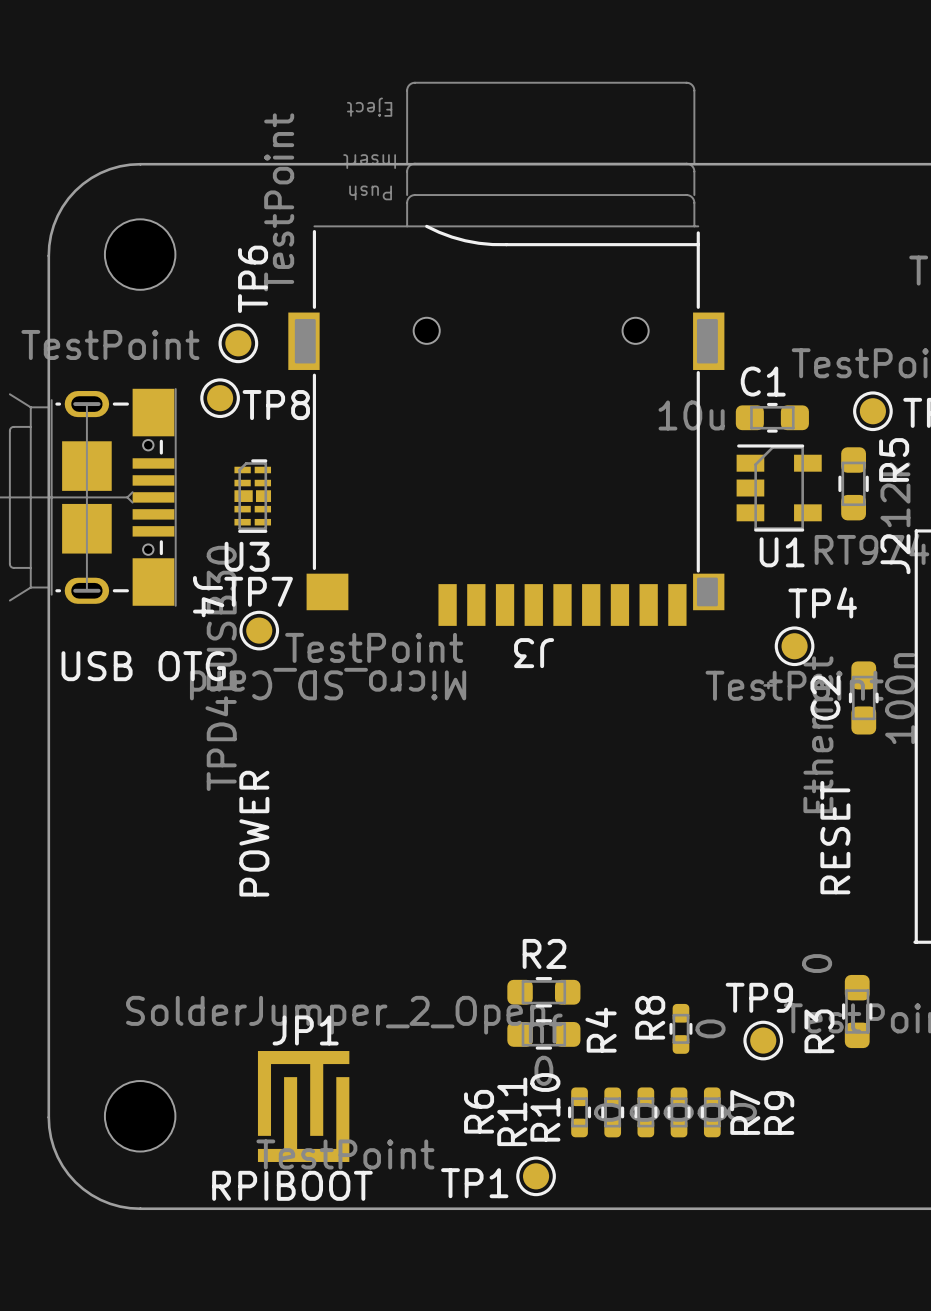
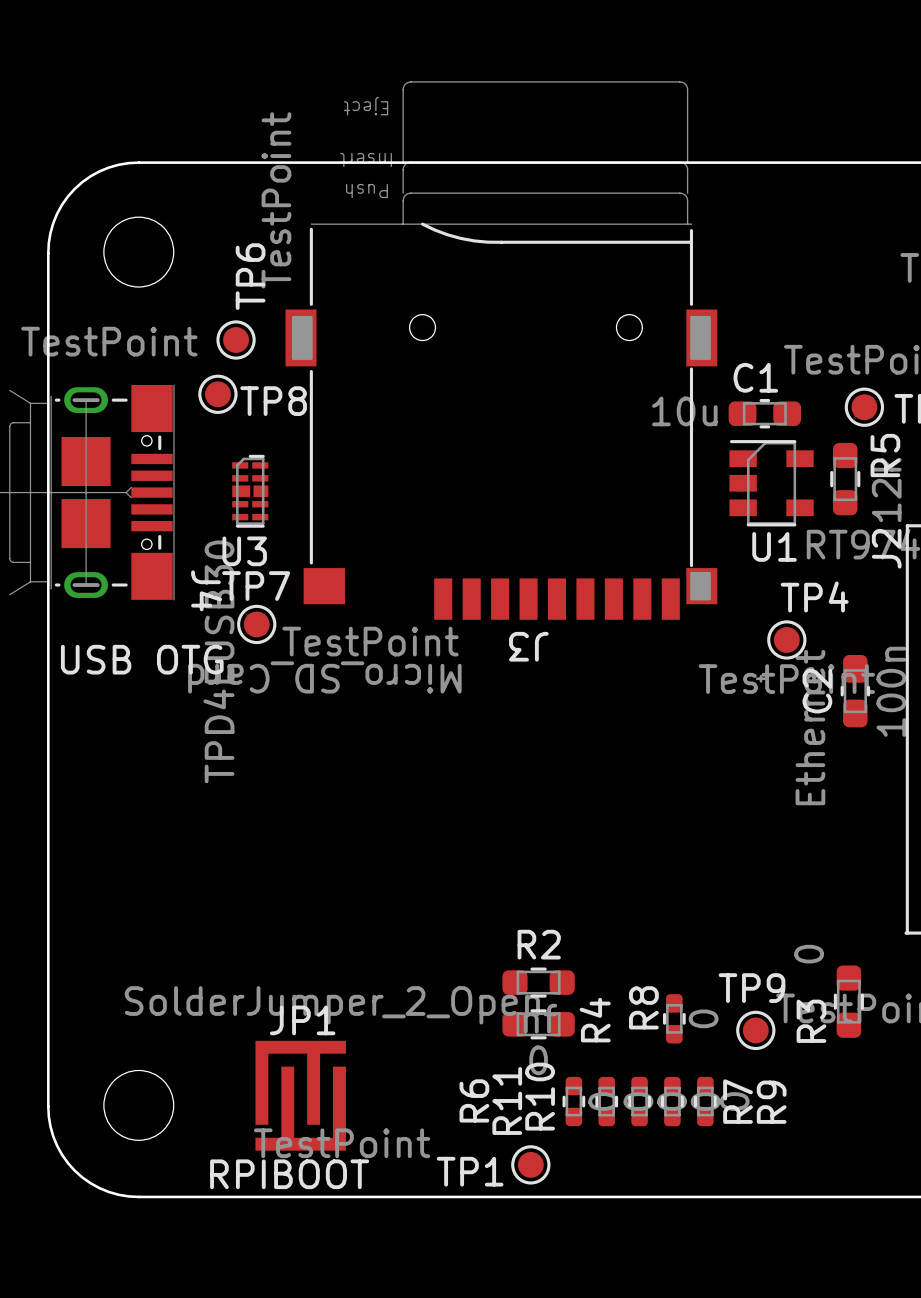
text: POWER (254, 833) -> none
text: RESET (835, 837) -> none

